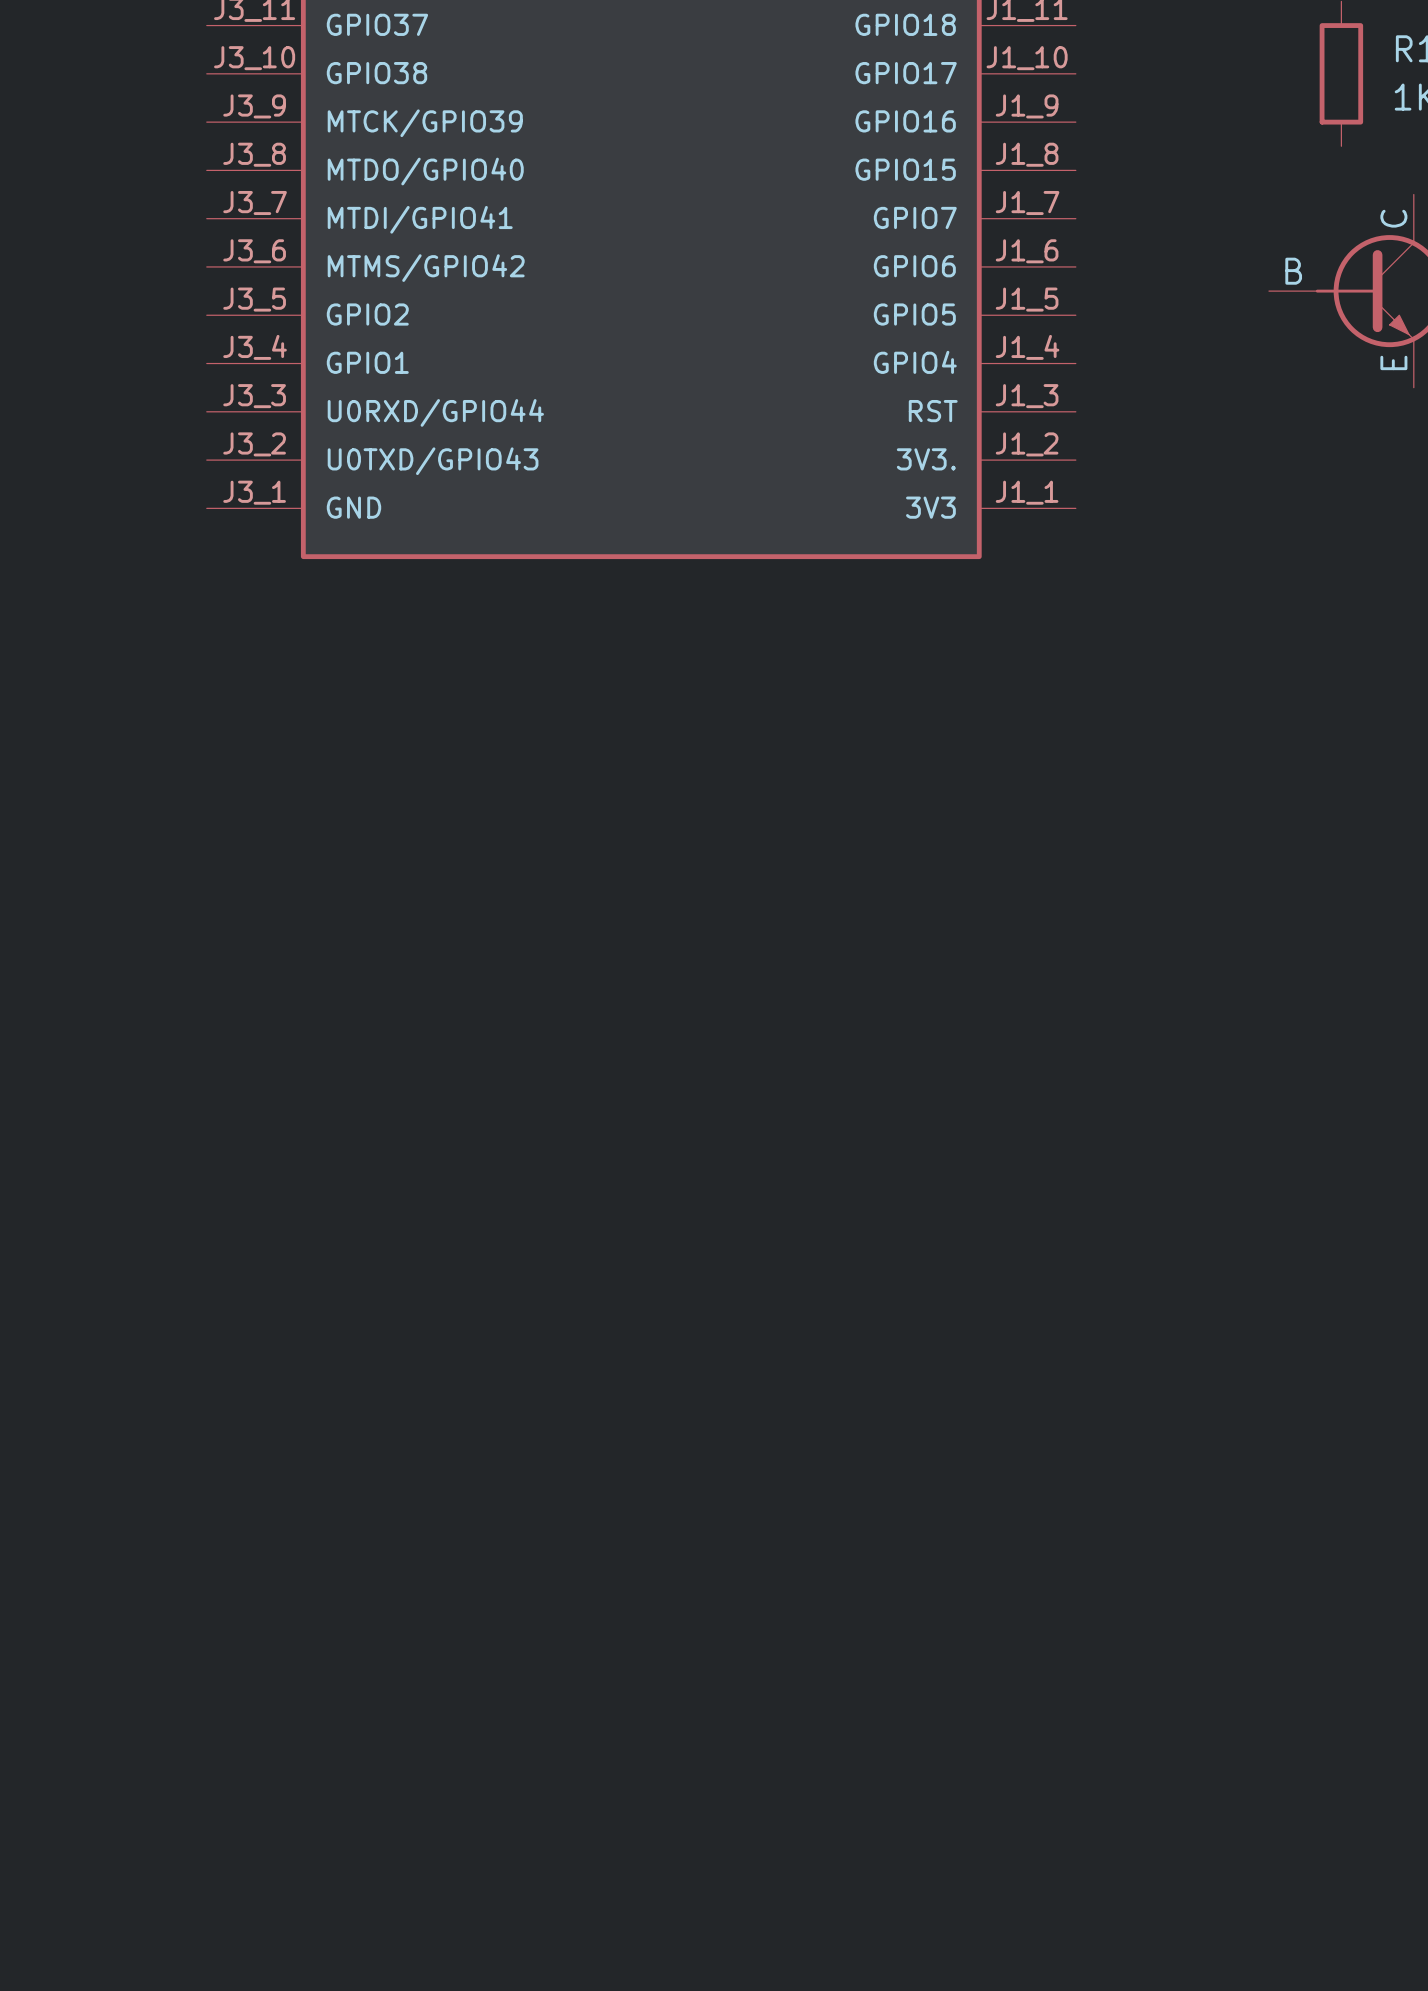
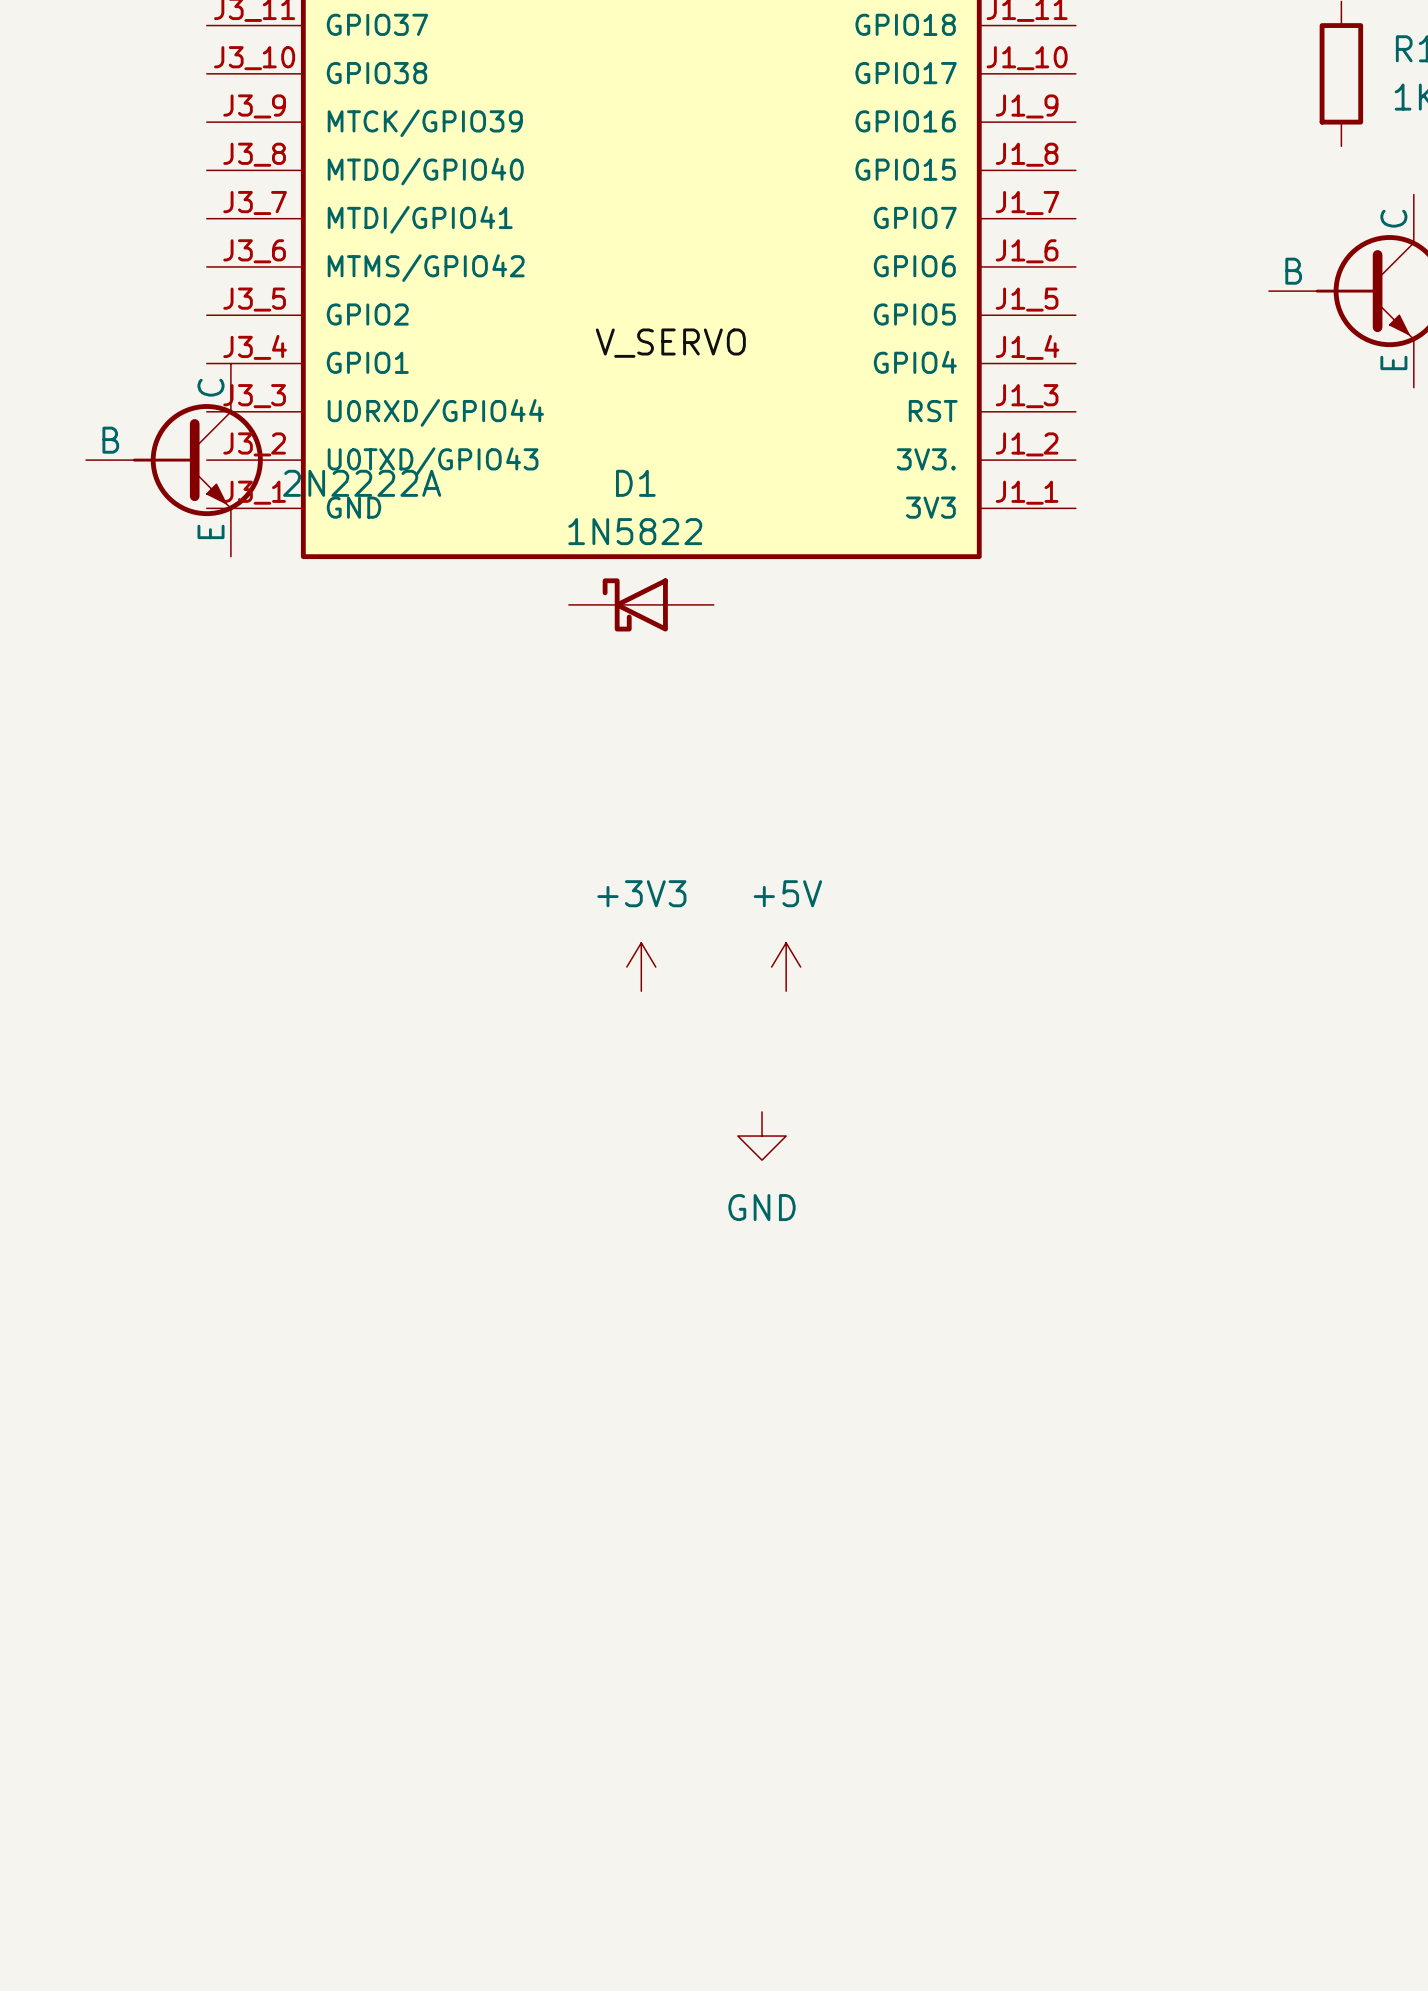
label: none -> V_SERVO (670, 343)
part: none -> 2N2222A (174, 460)
D1: none -> 1N5822 (641, 604)
power symbol: none -> +3V3 (641, 967)
power symbol: none -> +5V (786, 967)
power symbol: none -> GND (762, 1136)

